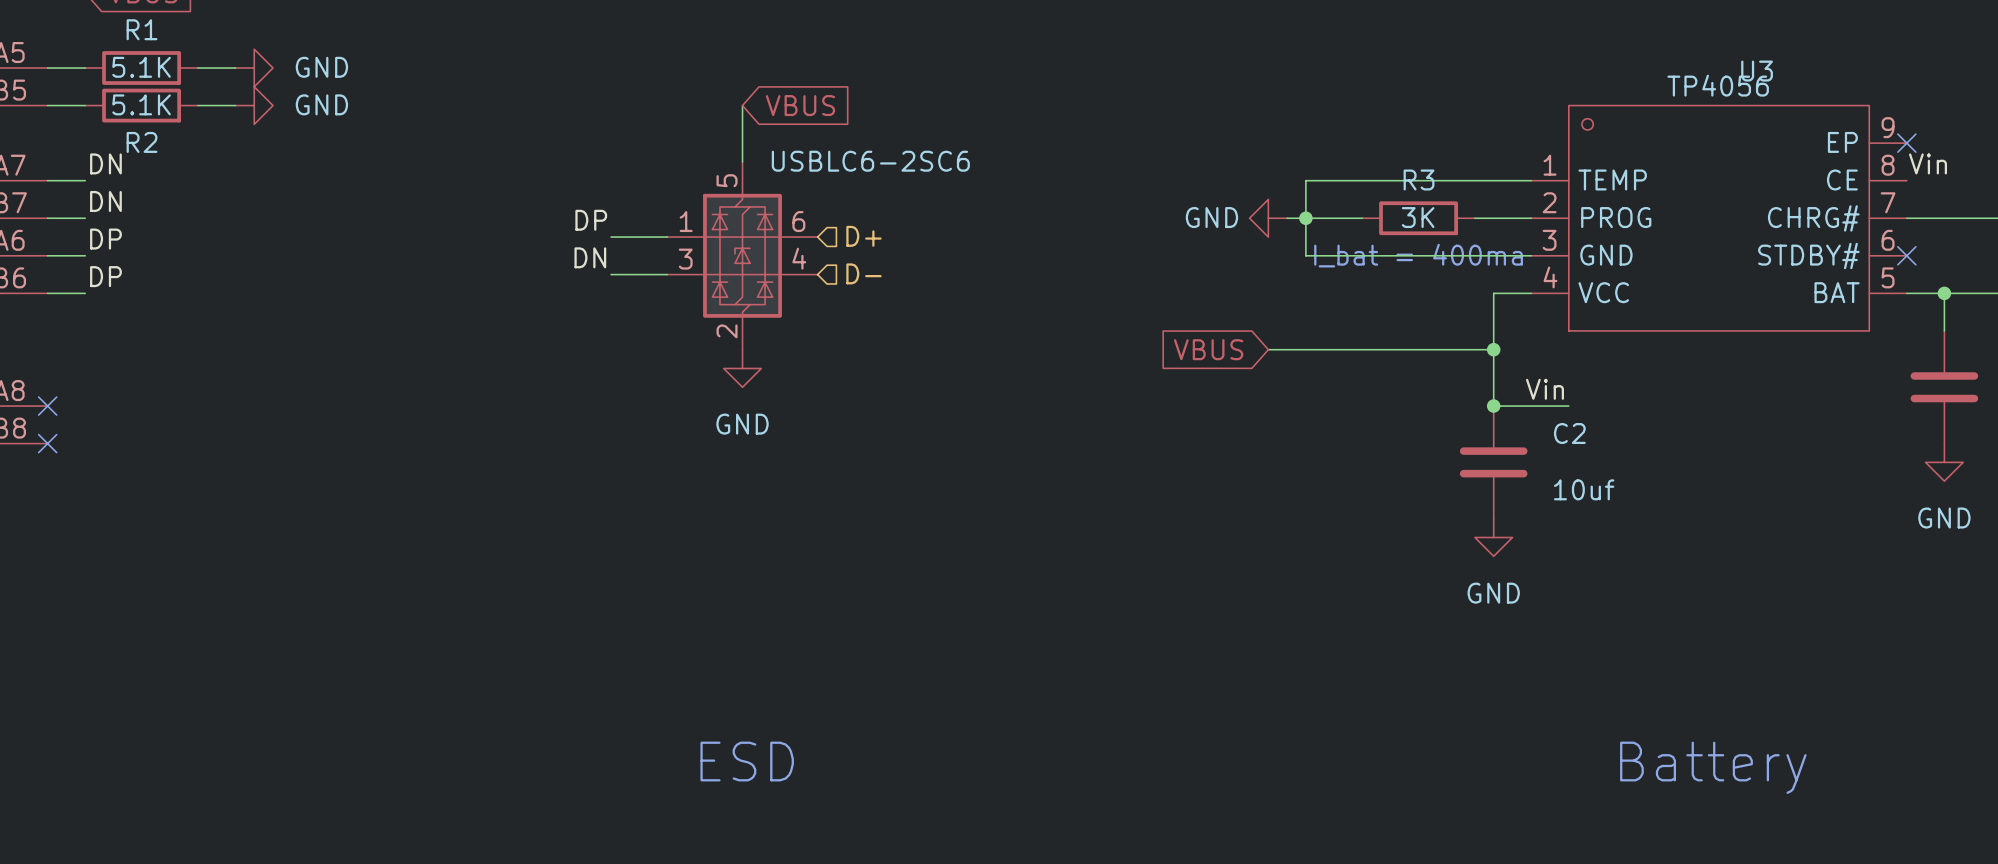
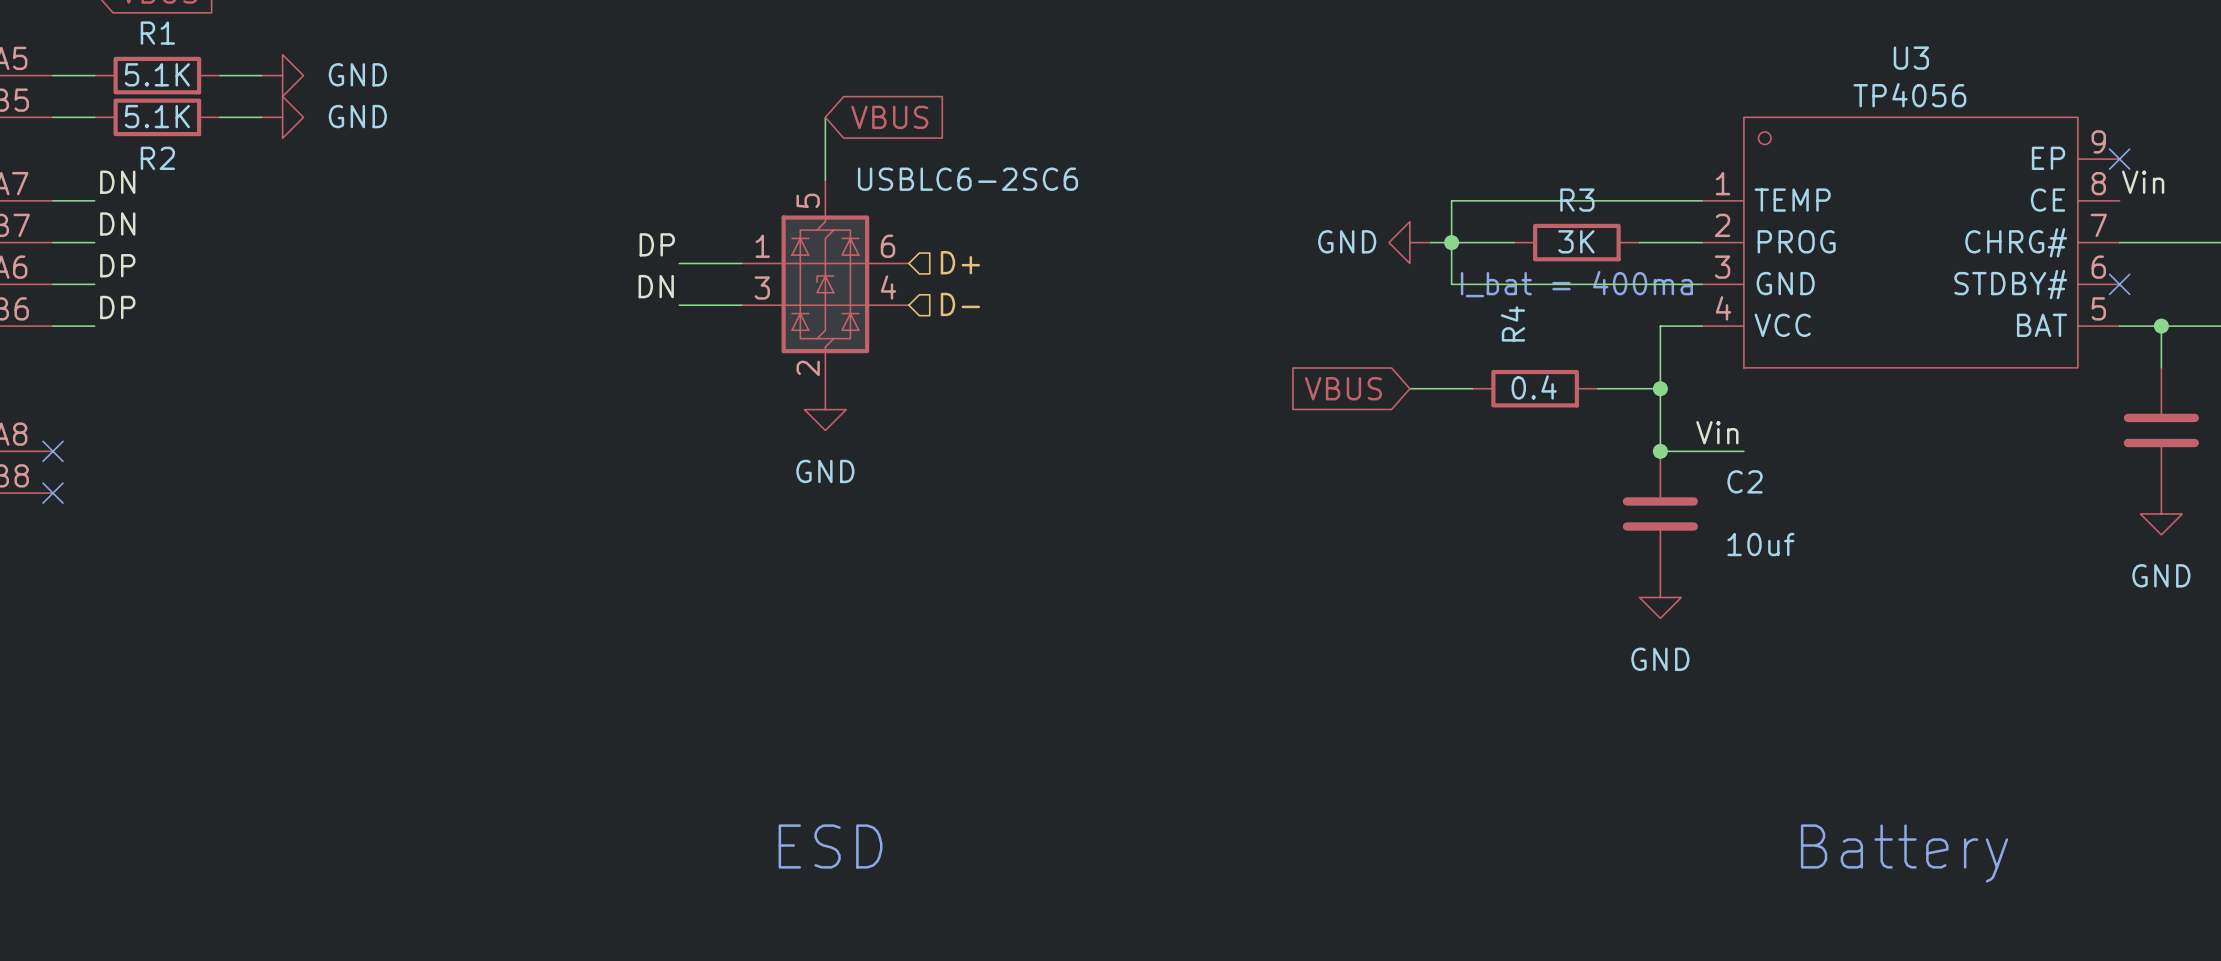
U3 name position: U3 (1757, 71) -> U3 (1911, 58)
wire: (1324, 349) (1437, 349) -> none
R4: none -> 0.4 (1535, 388)

